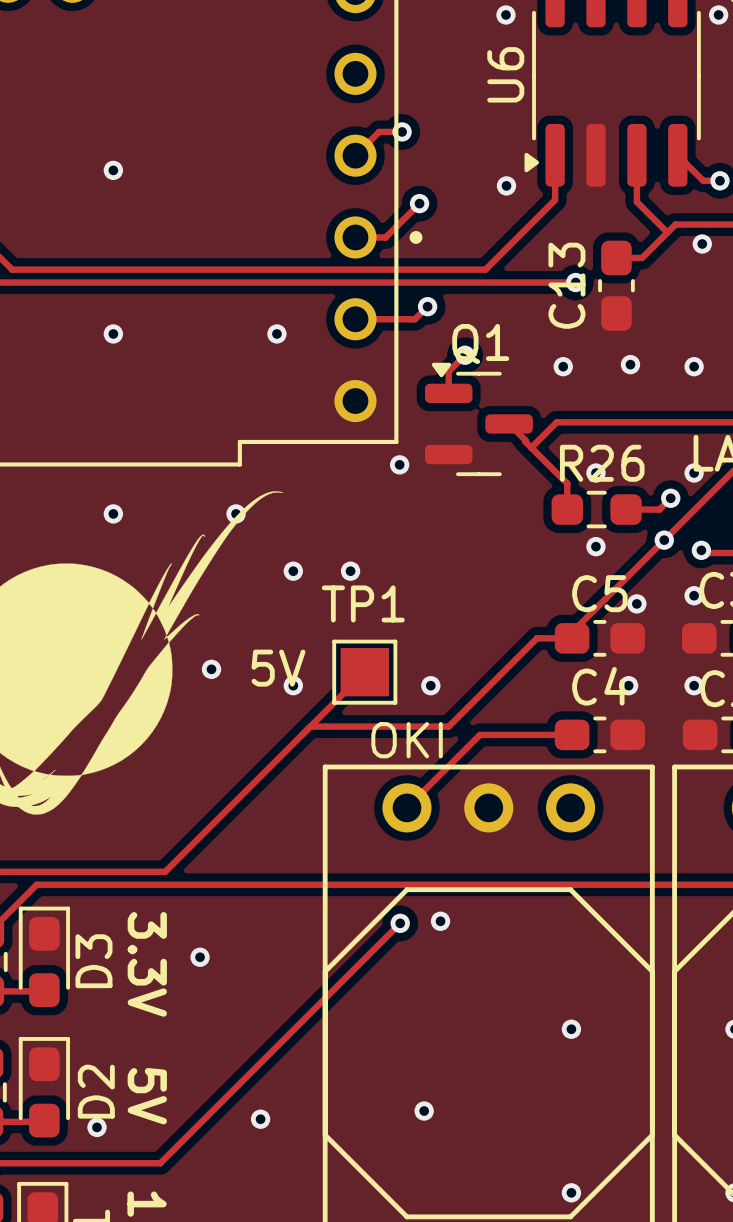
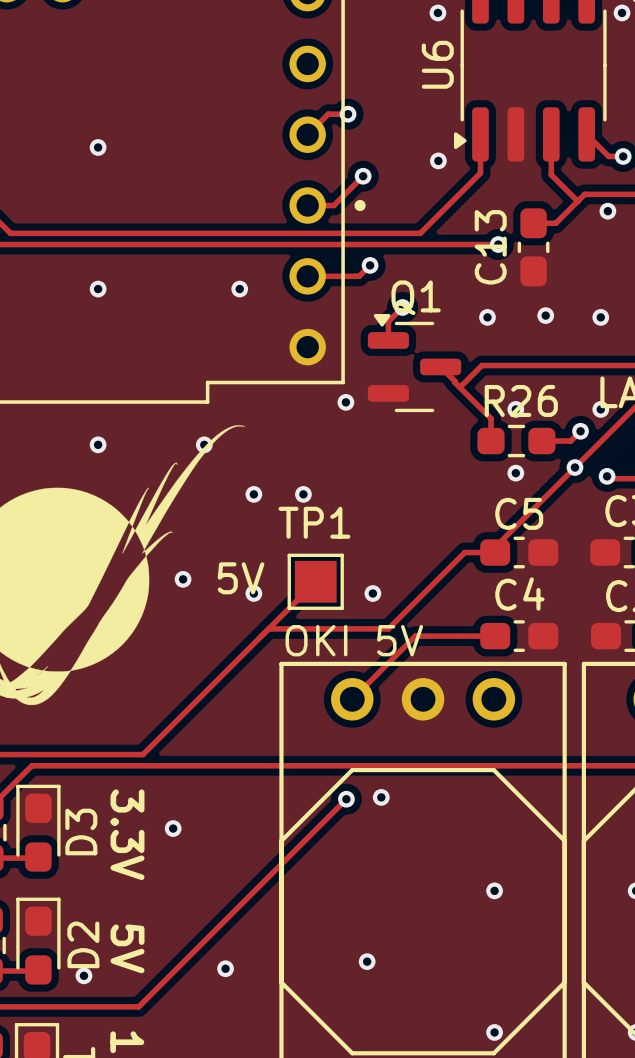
via: (694, 595) -> none
via: (636, 603) -> none
via: (628, 685) -> none
via: (694, 685) -> none
part value: OKI (407, 740) -> OKI 5V (354, 640)

